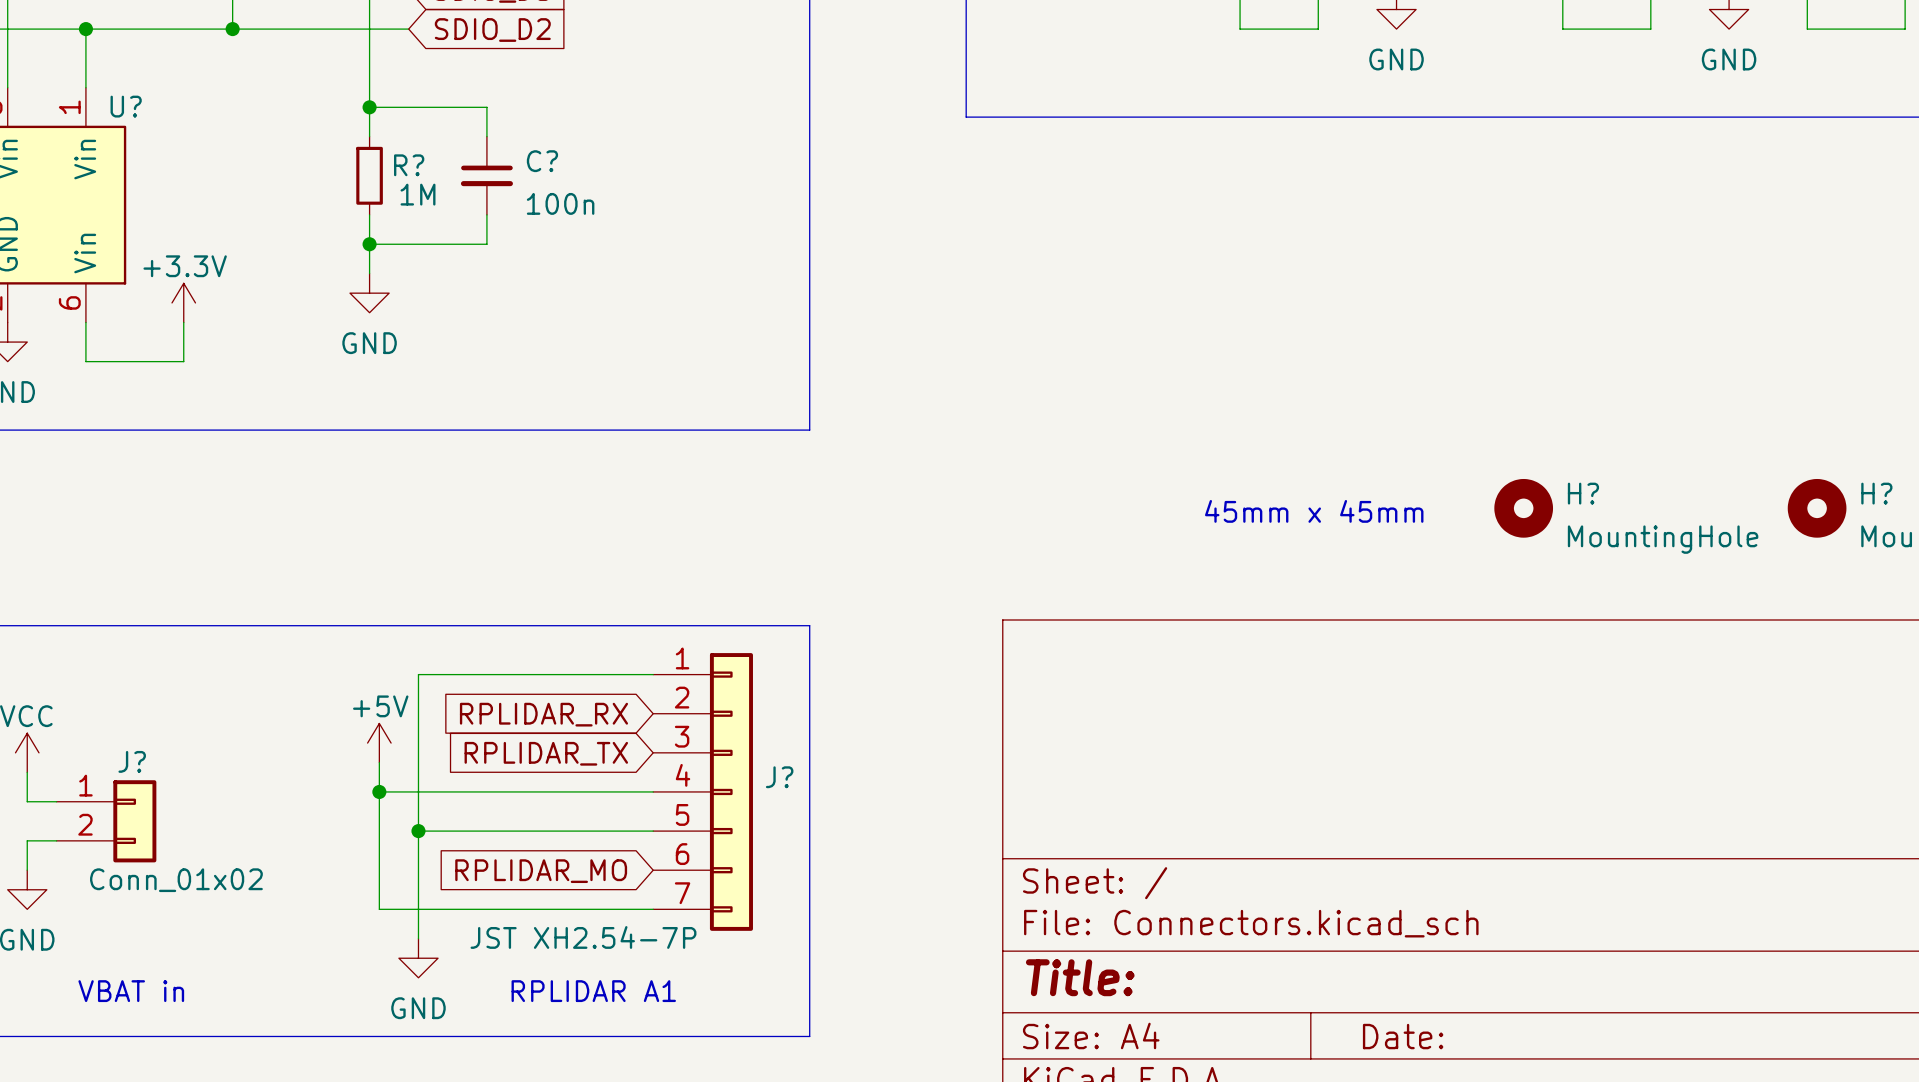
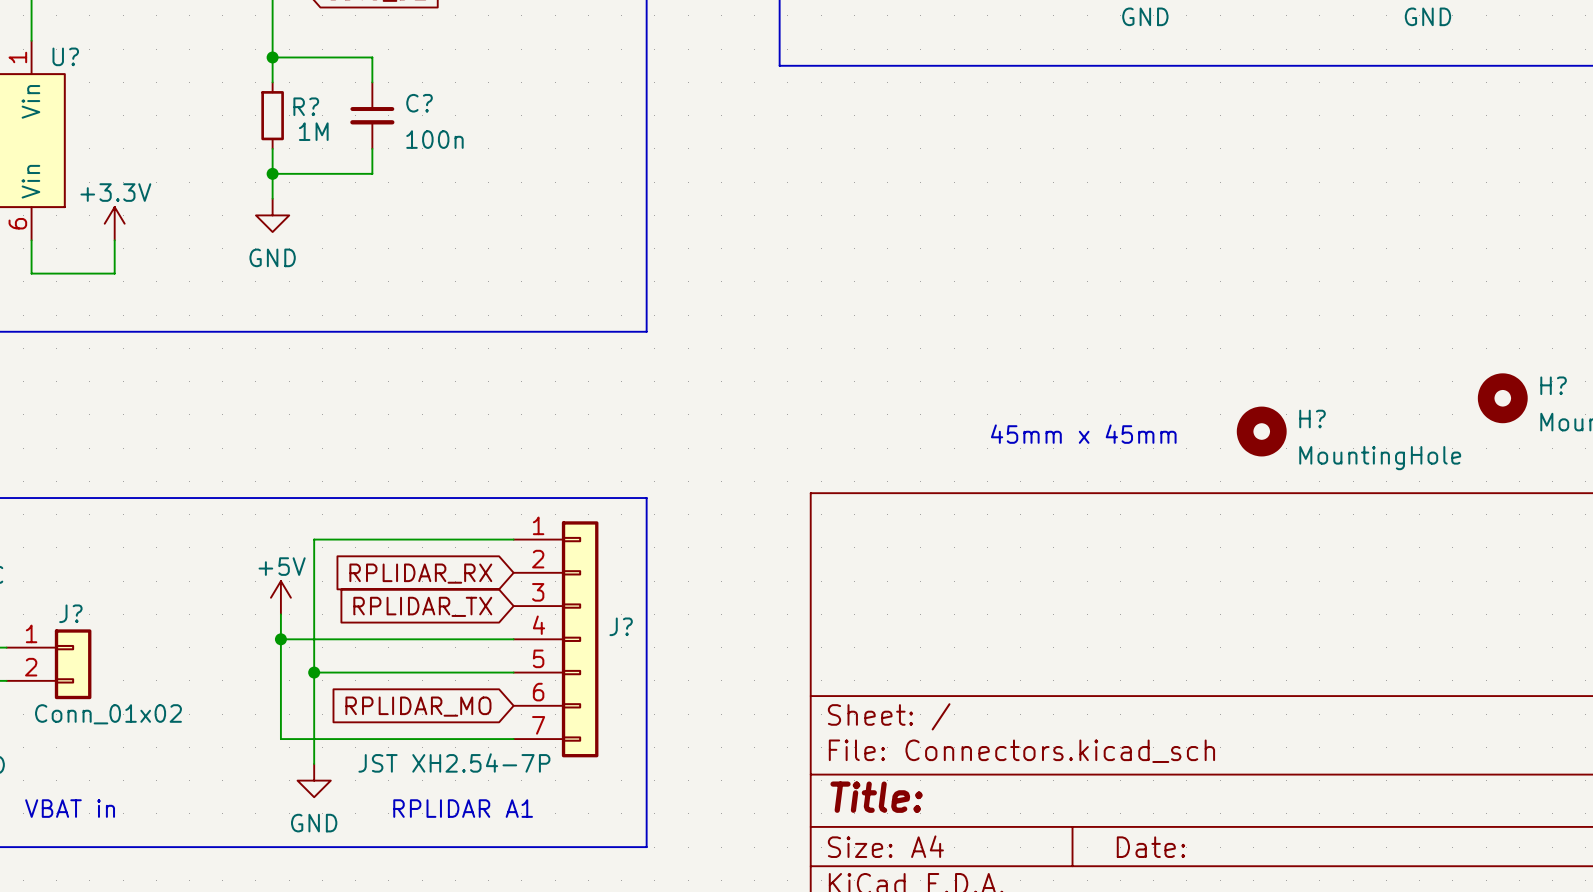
H? position: (1523, 508) -> (1261, 431)
text position: 45mm x 45mm (1314, 511) -> 45mm x 45mm (1083, 434)

